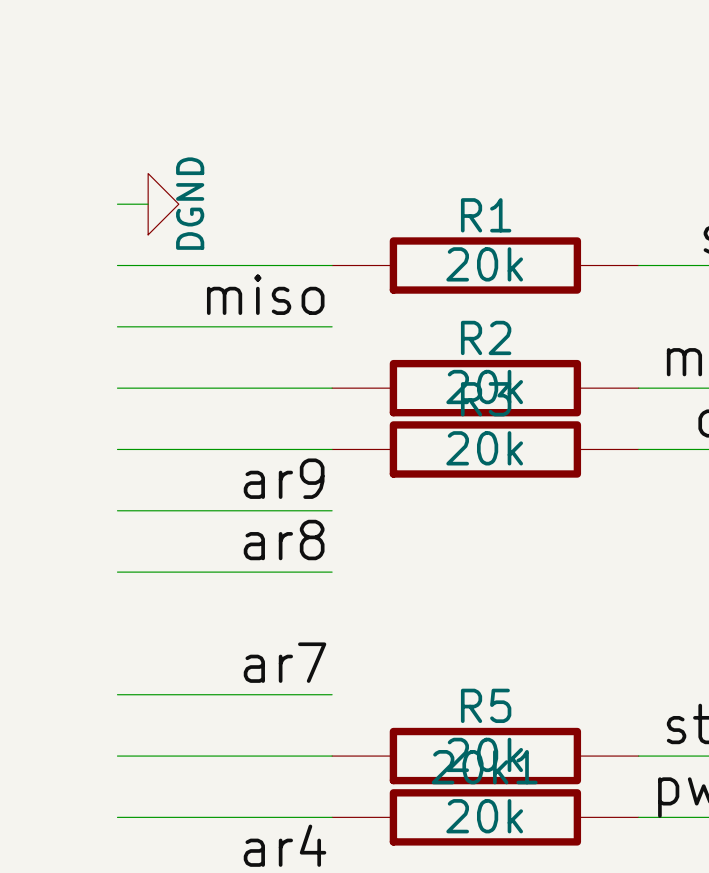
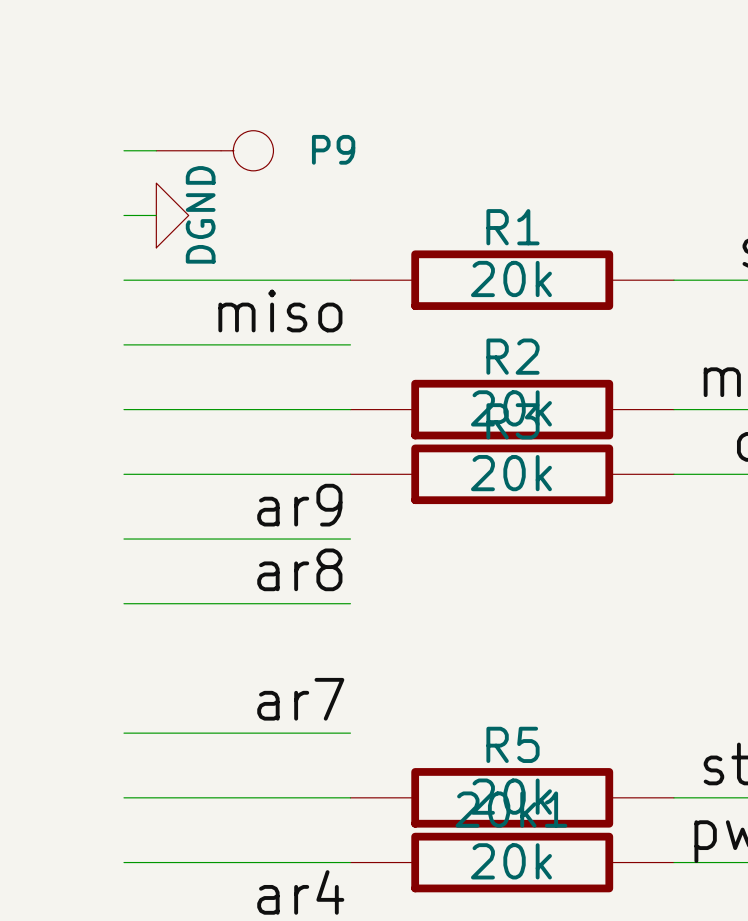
wire: none -> (123, 150) (156, 150)
P9: none -> (214, 150)

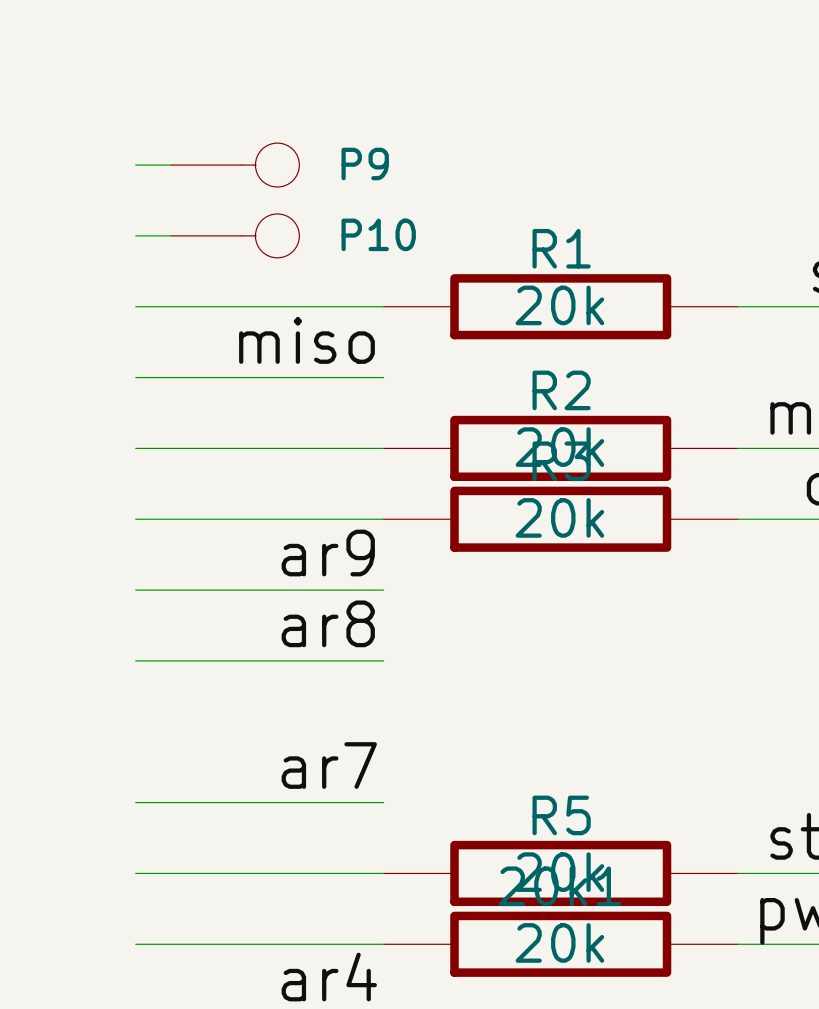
power symbol: DGND (172, 215) -> none
P10: none -> (235, 235)

